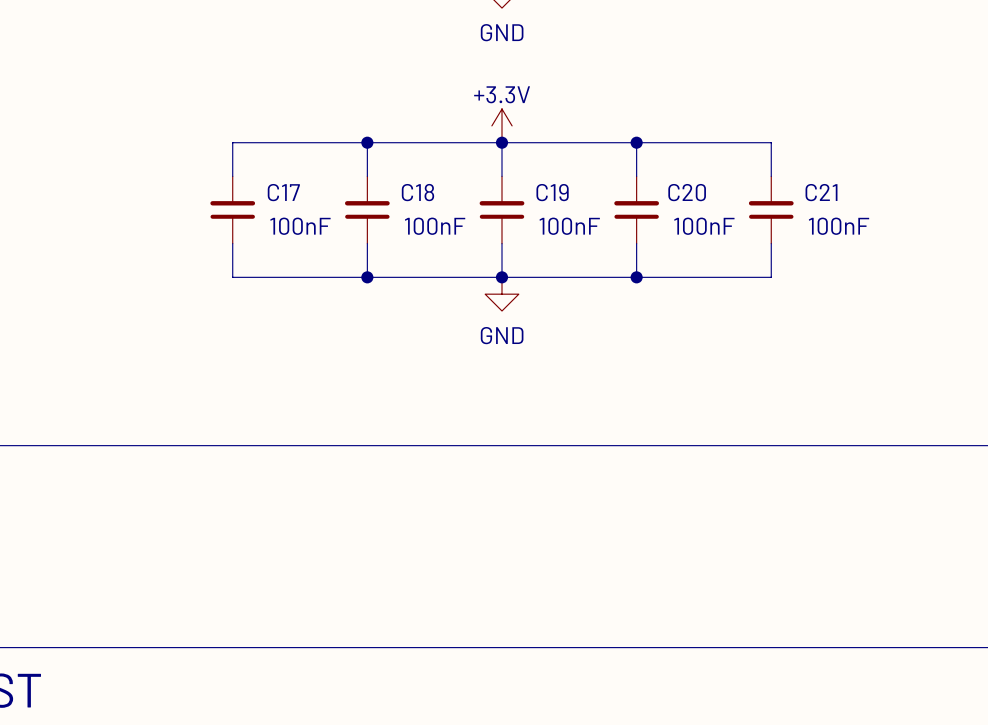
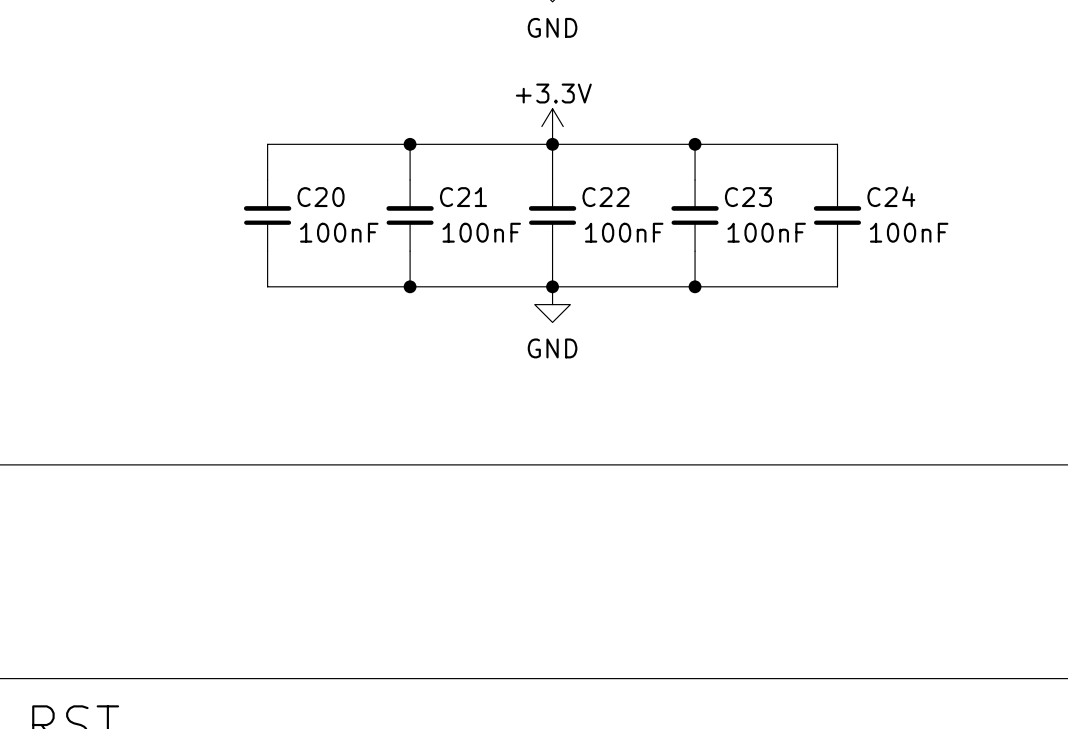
C17 name: C17 (283, 192) -> C20 (321, 197)
C18 name: C18 (417, 192) -> C21 (463, 197)
C19 name: C19 (552, 192) -> C22 (605, 197)
C20 name: C20 (687, 192) -> C23 (748, 197)
C21 name: C21 (821, 192) -> C24 (891, 196)

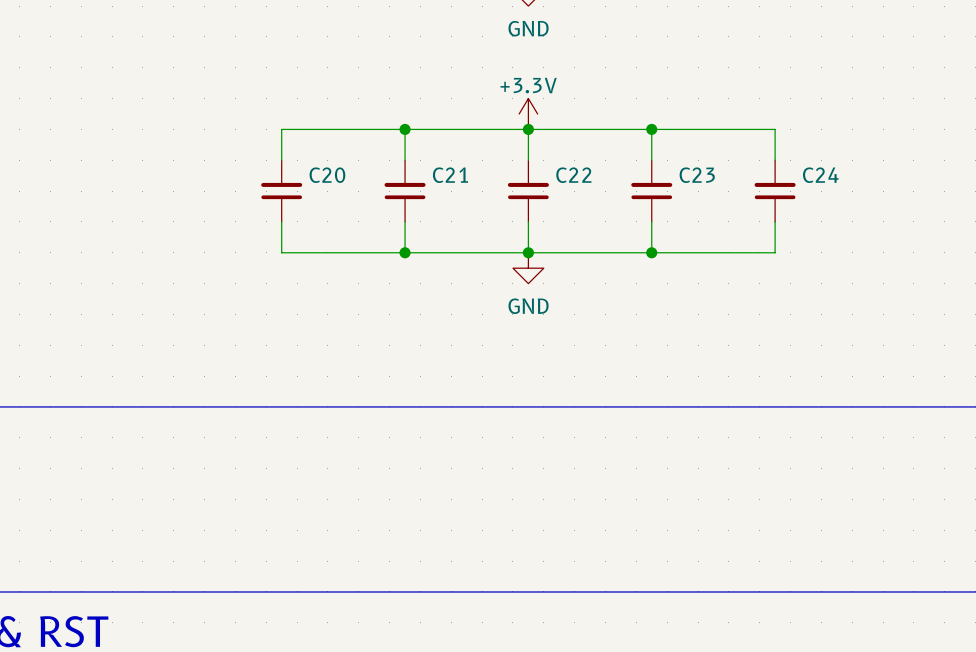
C20 value: 100nF (339, 232) -> none
C21 value: 100nF (481, 232) -> none
C22 value: 100nF (624, 232) -> none
C23 value: 100nF (766, 232) -> none
C24 value: 100nF (909, 232) -> none

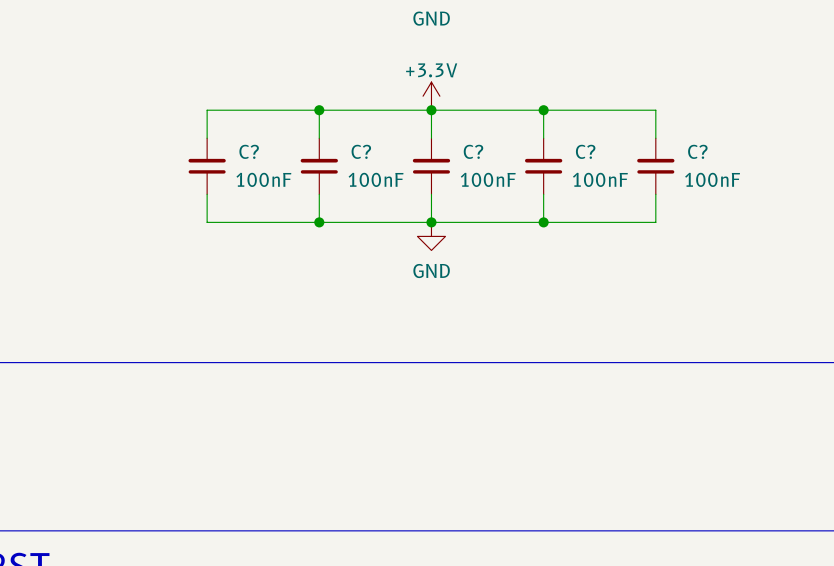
C20 name: C20 (327, 175) -> C? (249, 151)
C21 name: C21 (450, 175) -> C? (361, 151)
C22 name: C22 (573, 175) -> C? (473, 151)
C23 name: C23 (697, 175) -> C? (585, 151)
C24 name: C24 (820, 175) -> C? (697, 151)
C20 value: none -> 100nF (263, 179)
C21 value: none -> 100nF (376, 179)
C22 value: none -> 100nF (488, 179)
C23 value: none -> 100nF (600, 179)
C24 value: none -> 100nF (712, 179)

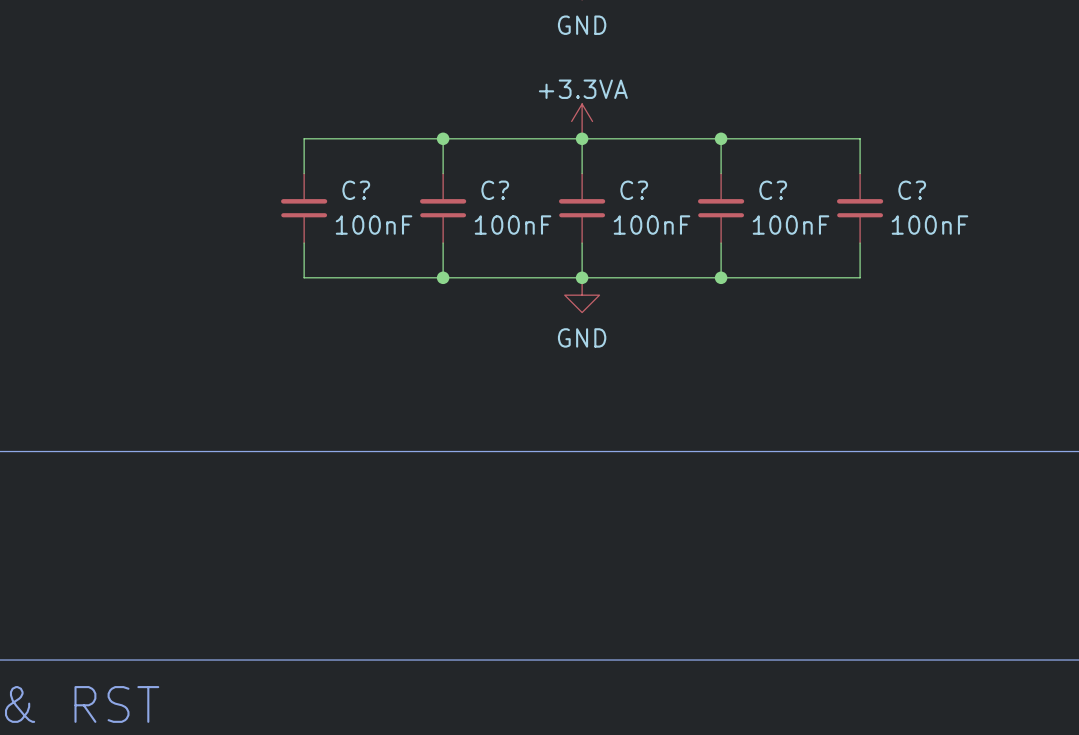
power symbol: +3.3V (431, 96) -> +3.3VA (582, 121)

